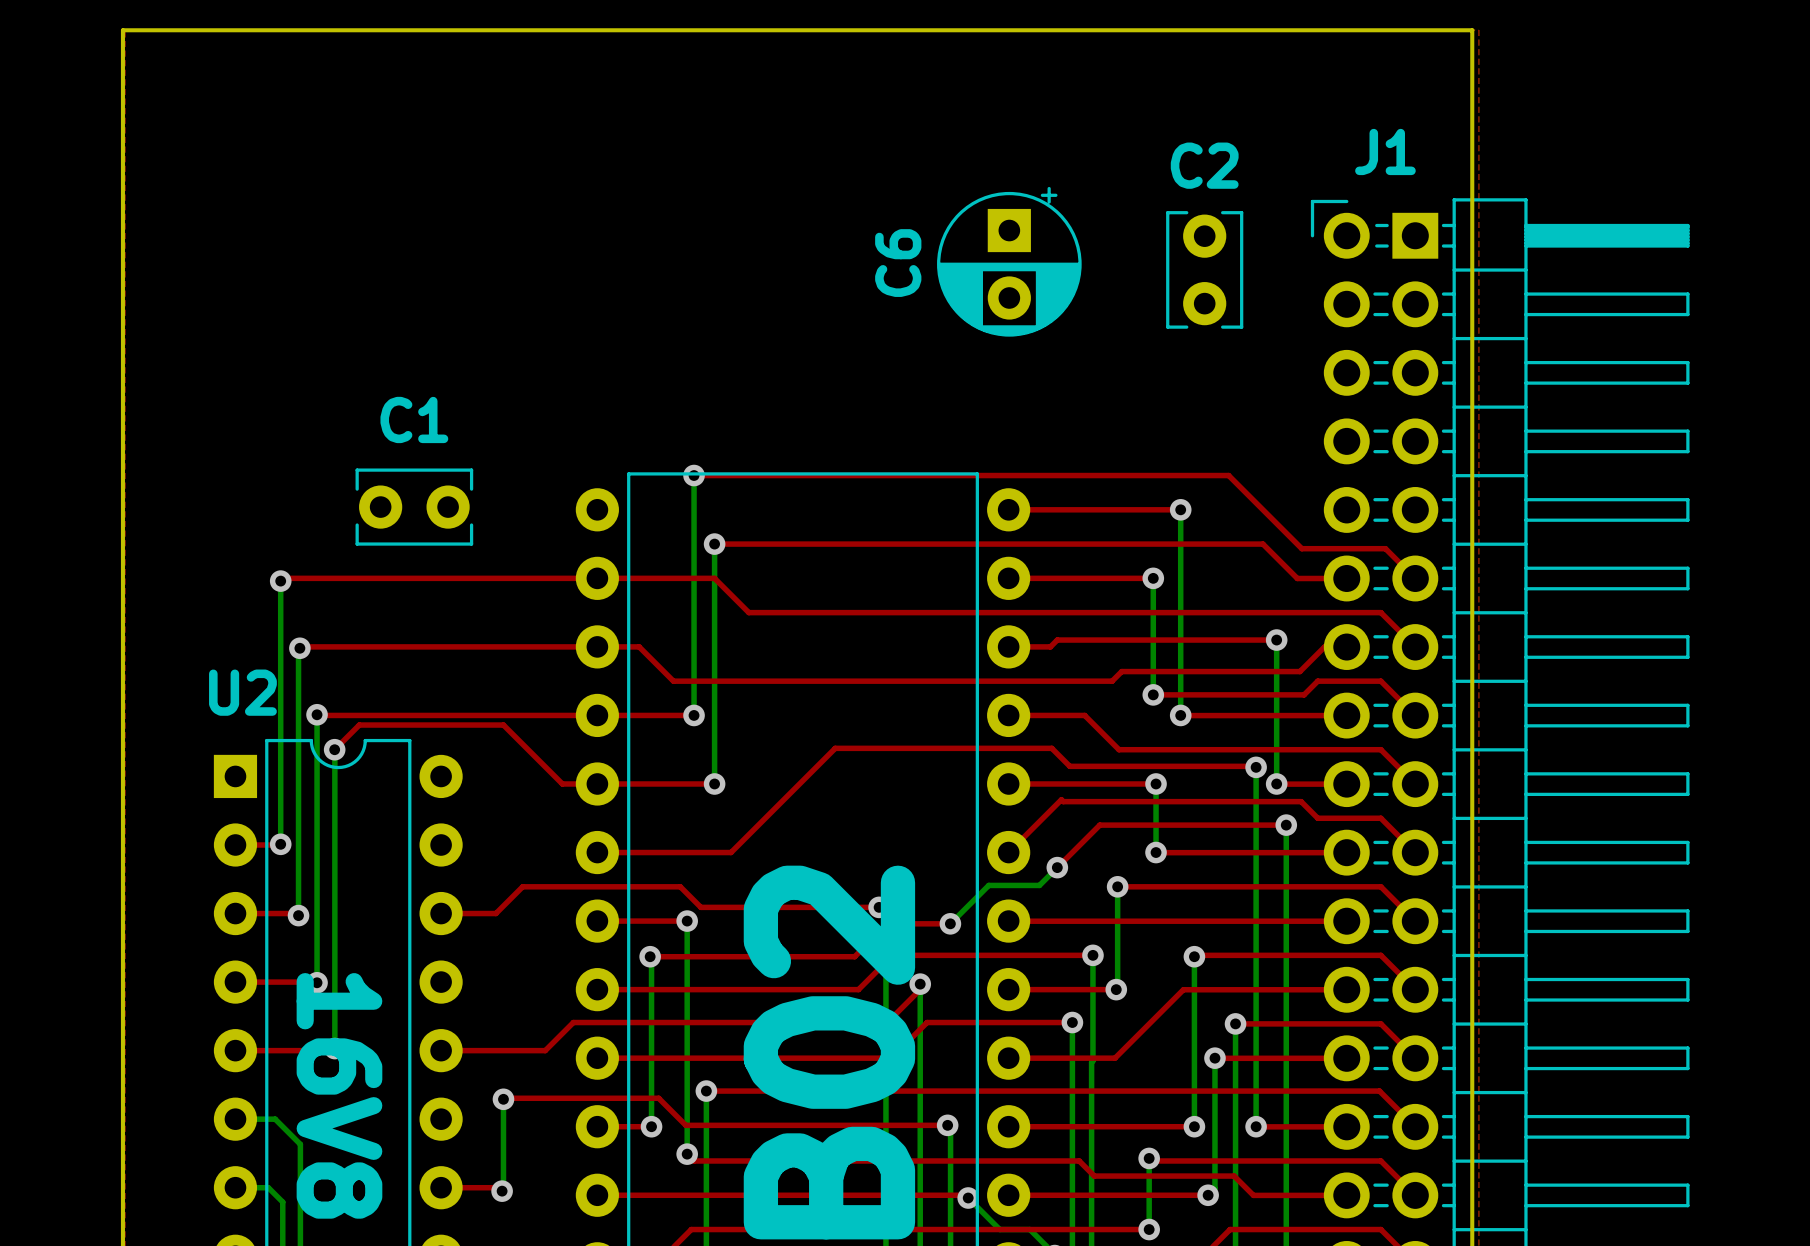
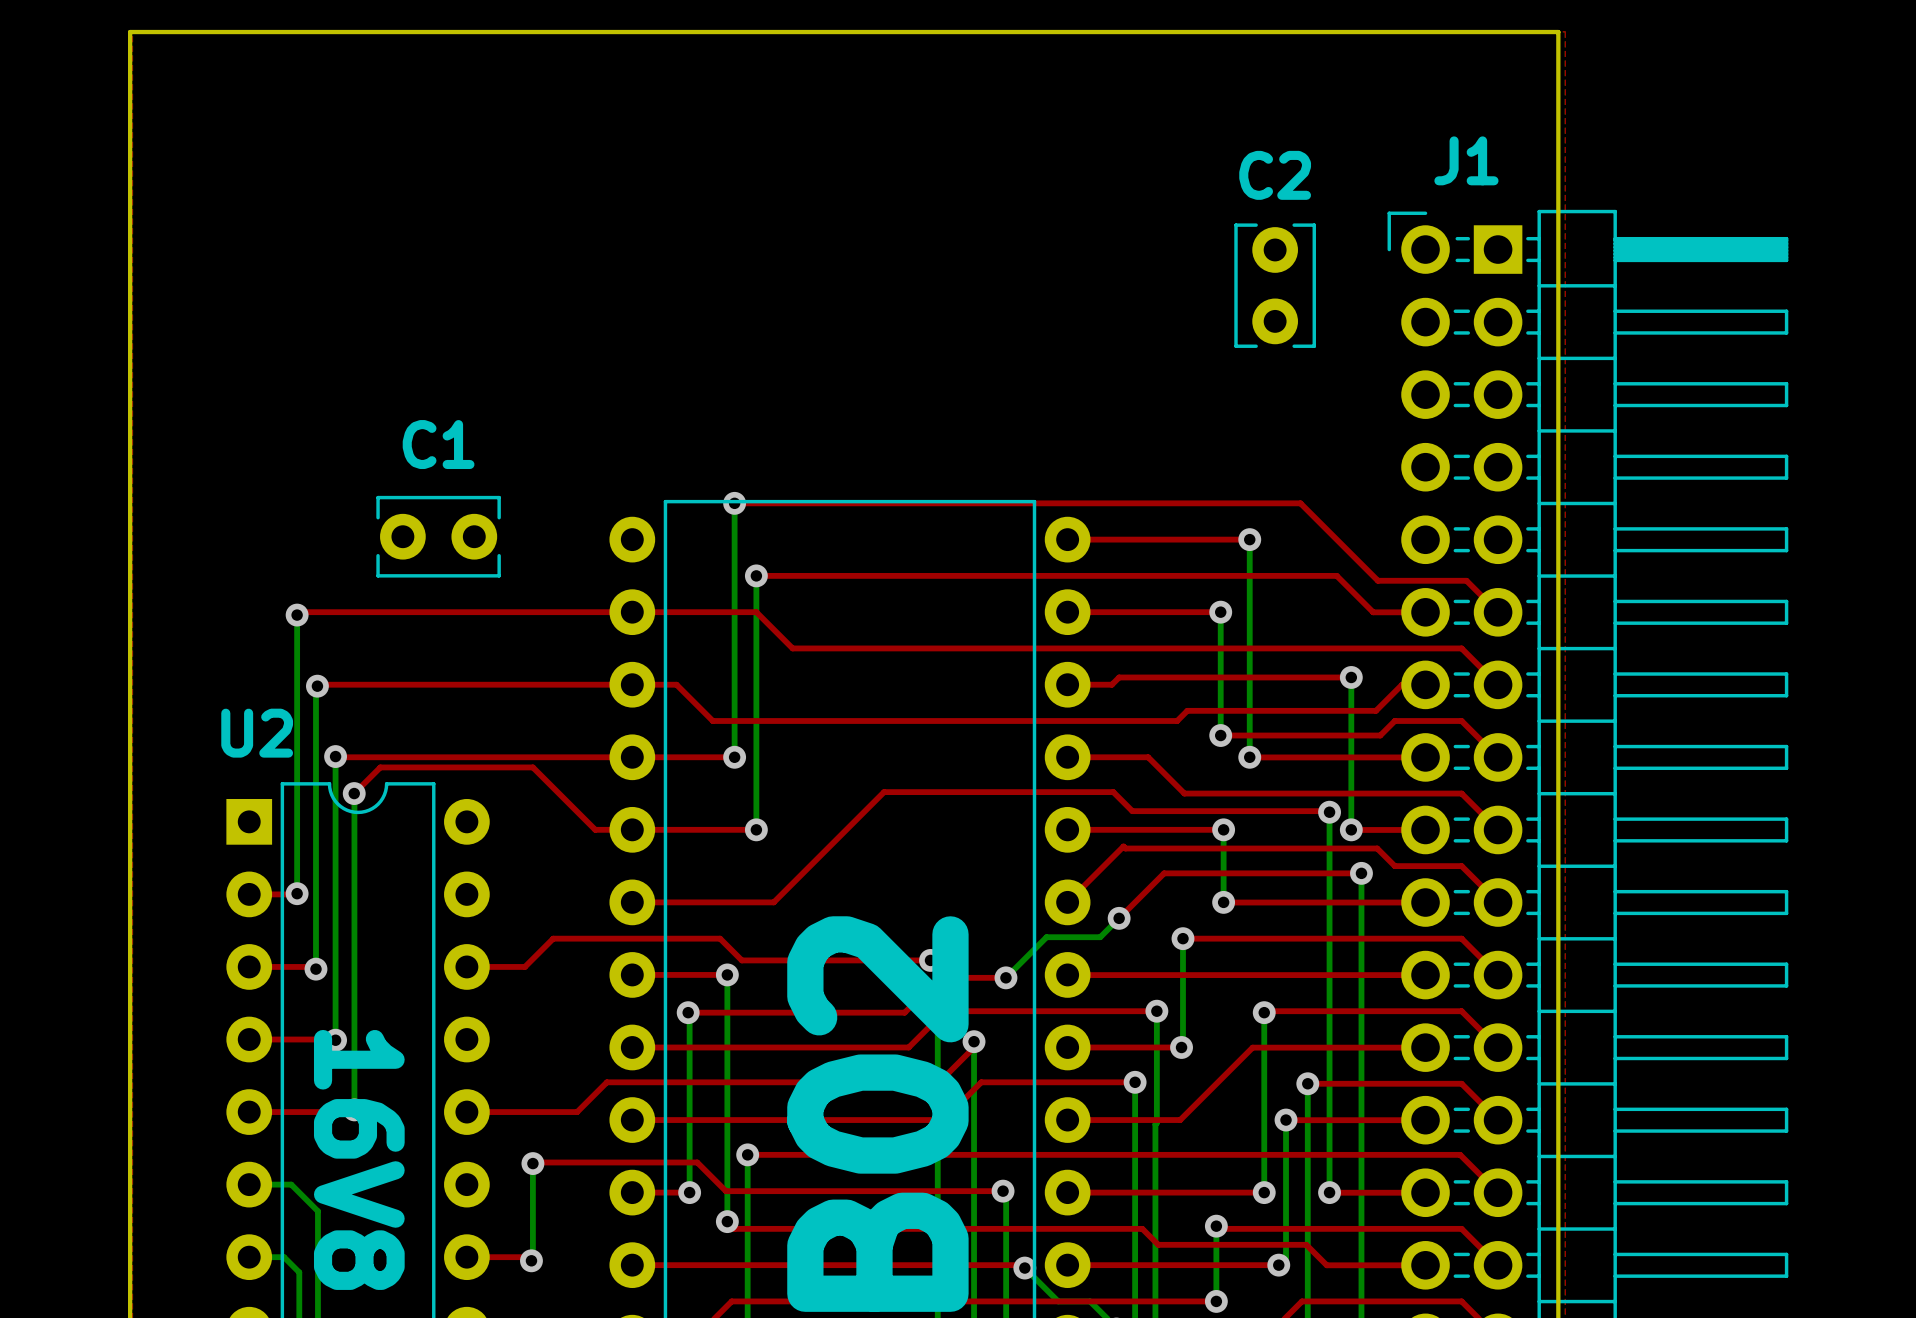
C6: (1009, 261) -> none

